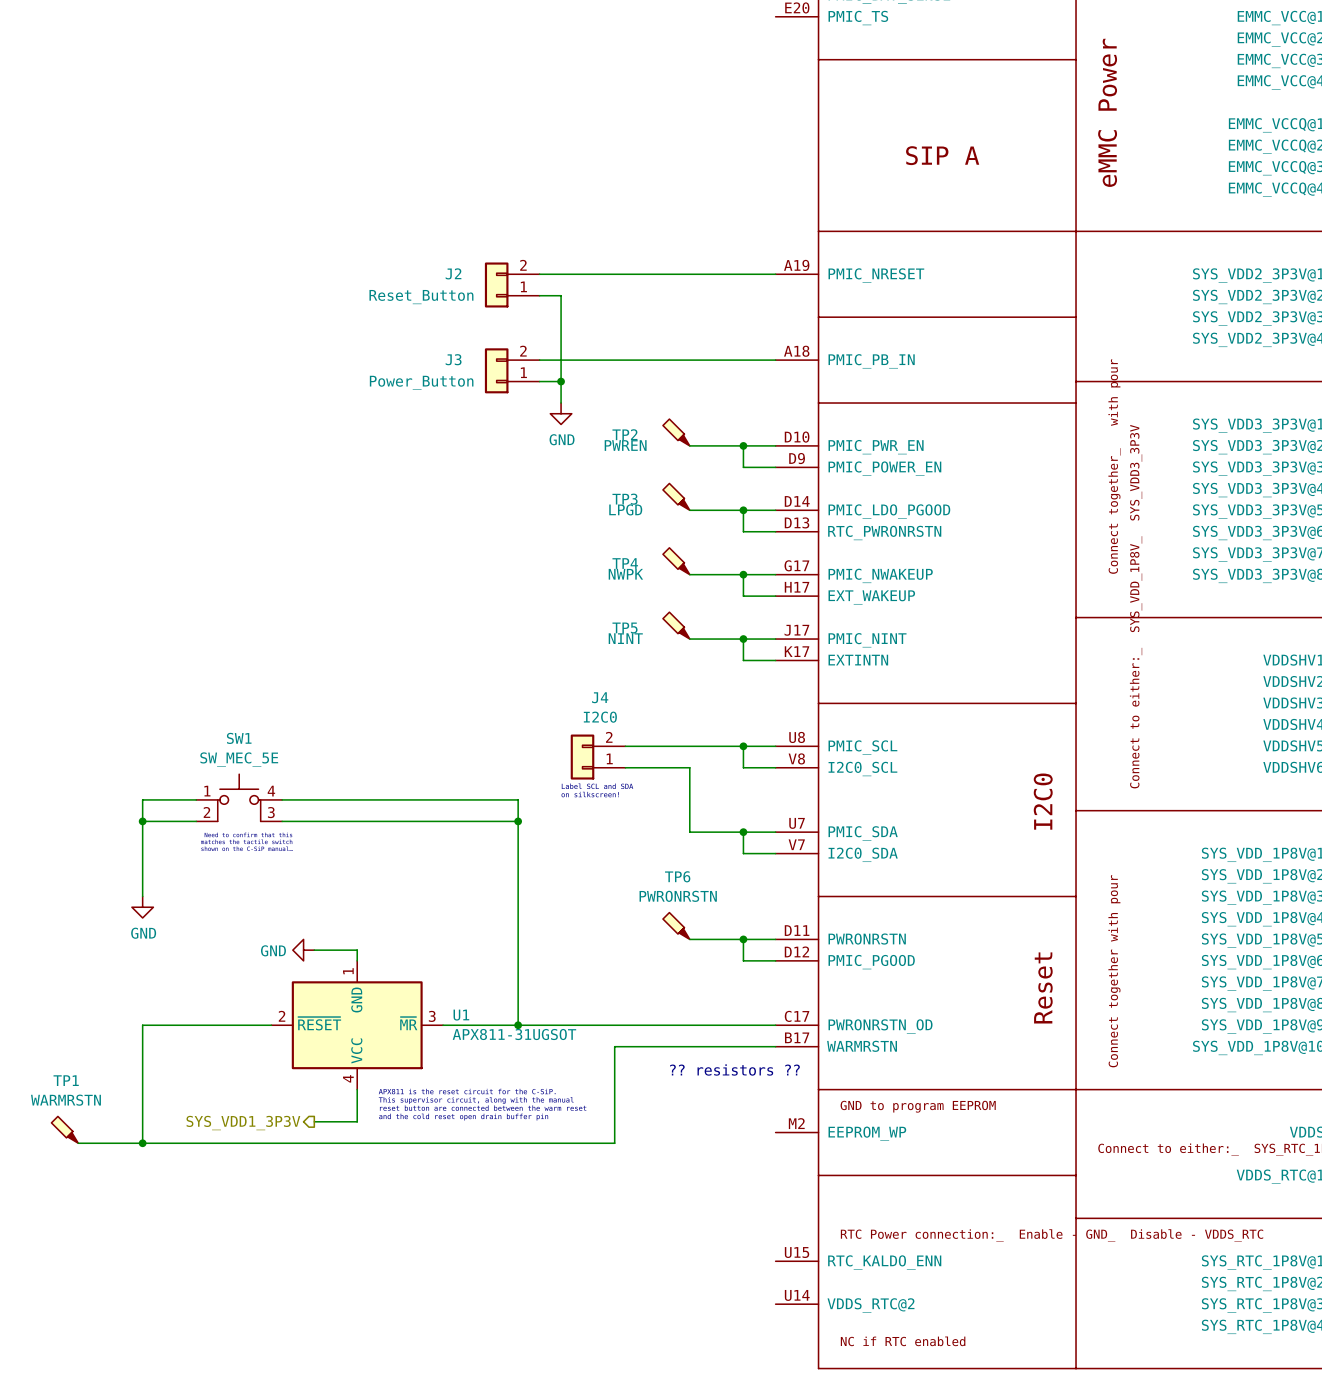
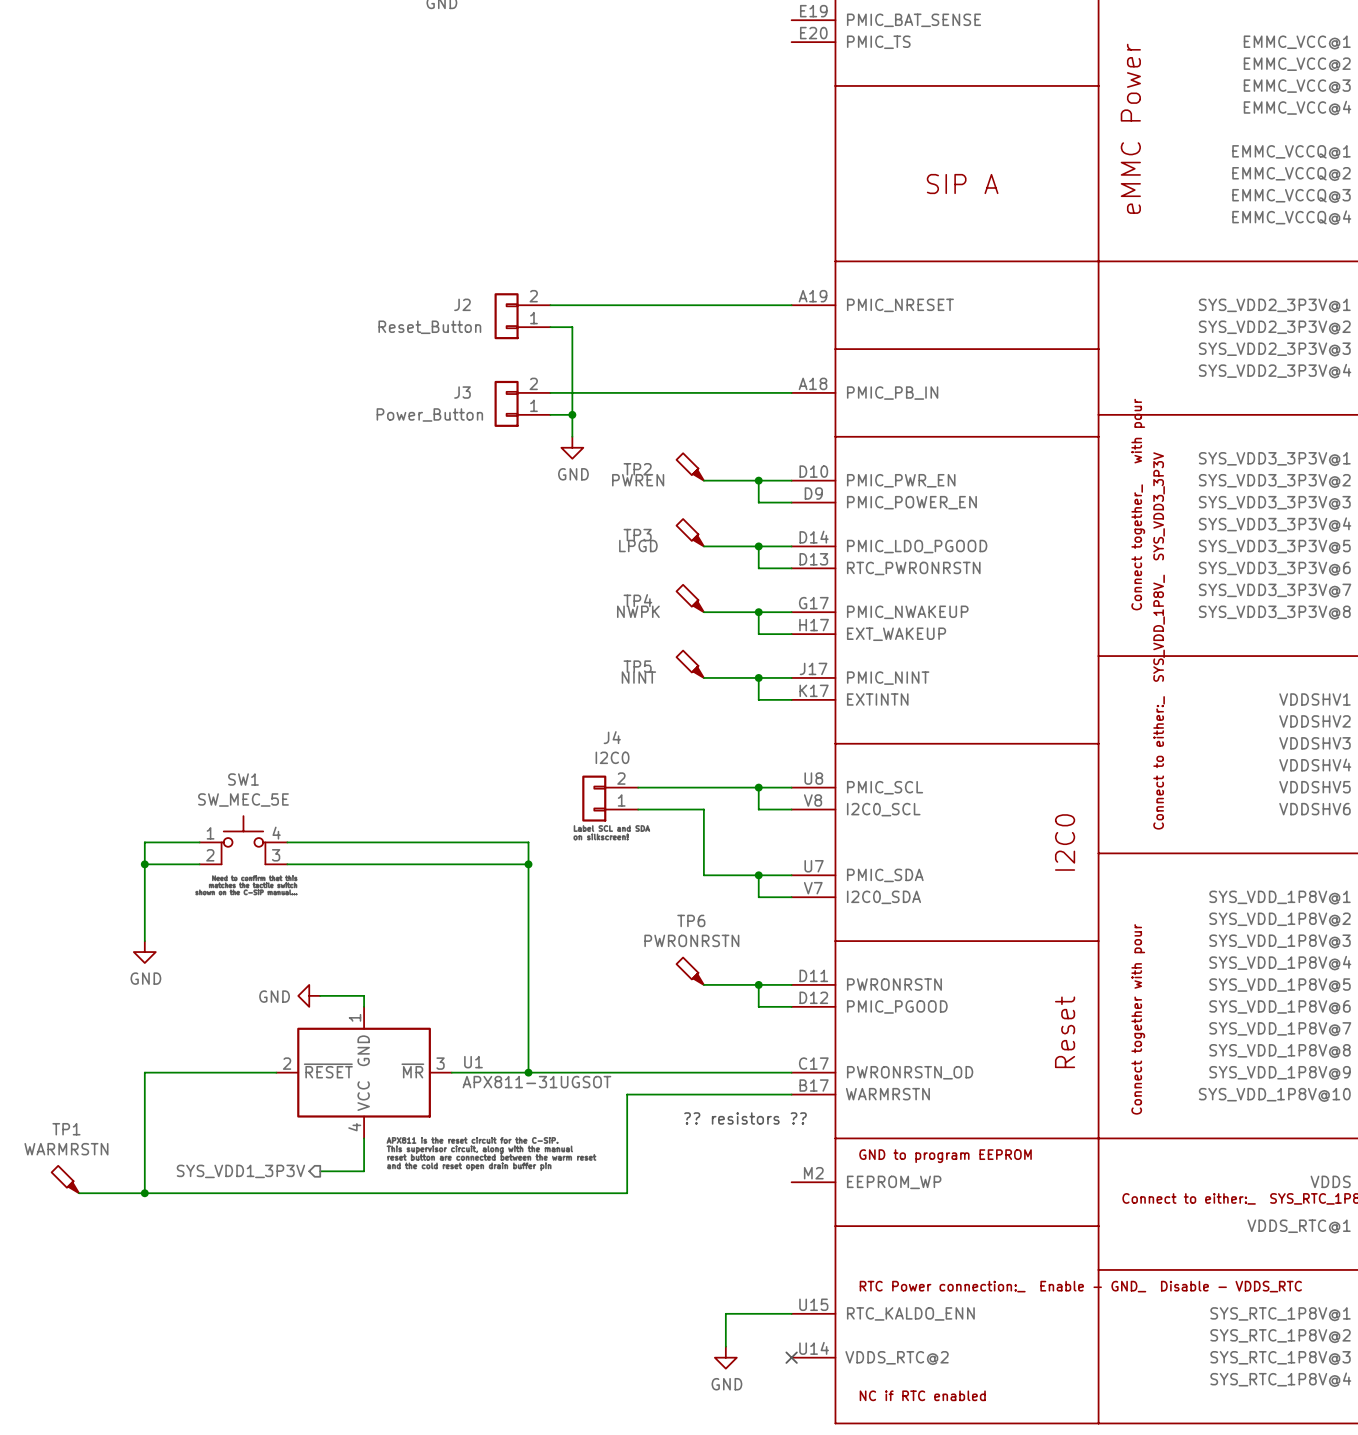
wire: none -> (791, 1313) (725, 1313) (725, 1346)
power symbol: none -> GND (725, 1357)
no-connect mark: none -> (791, 1357)

